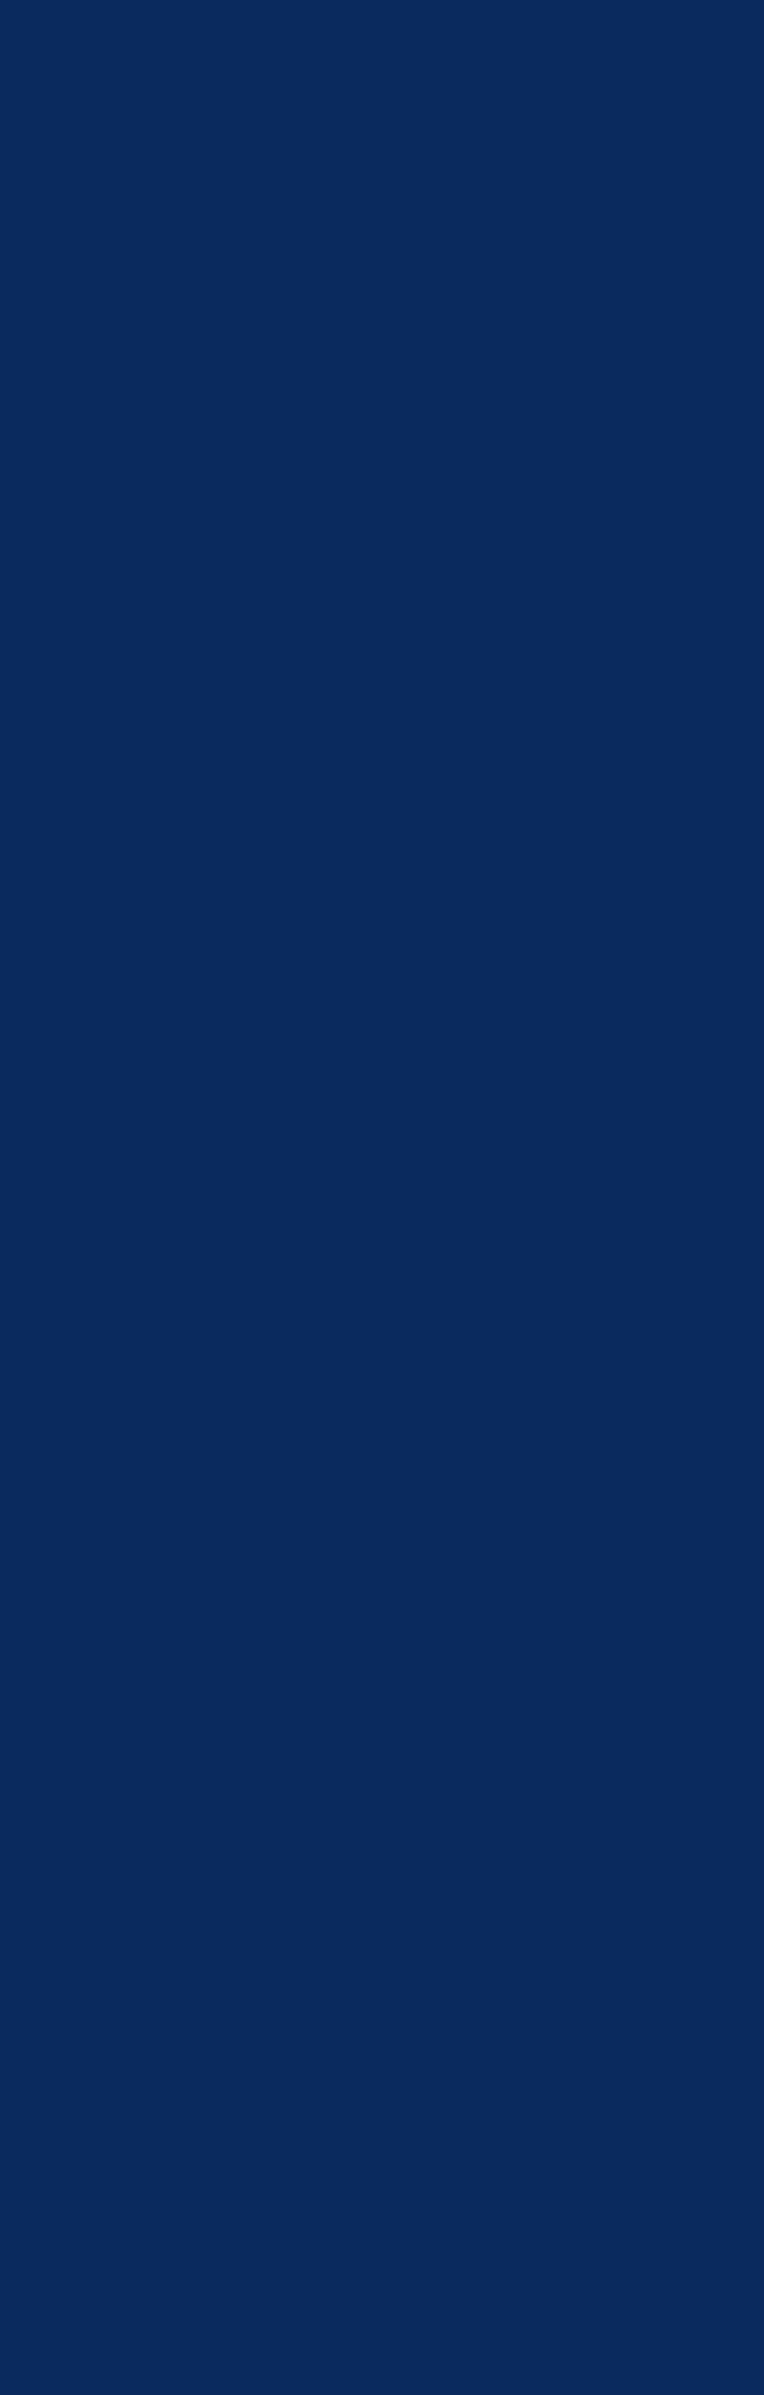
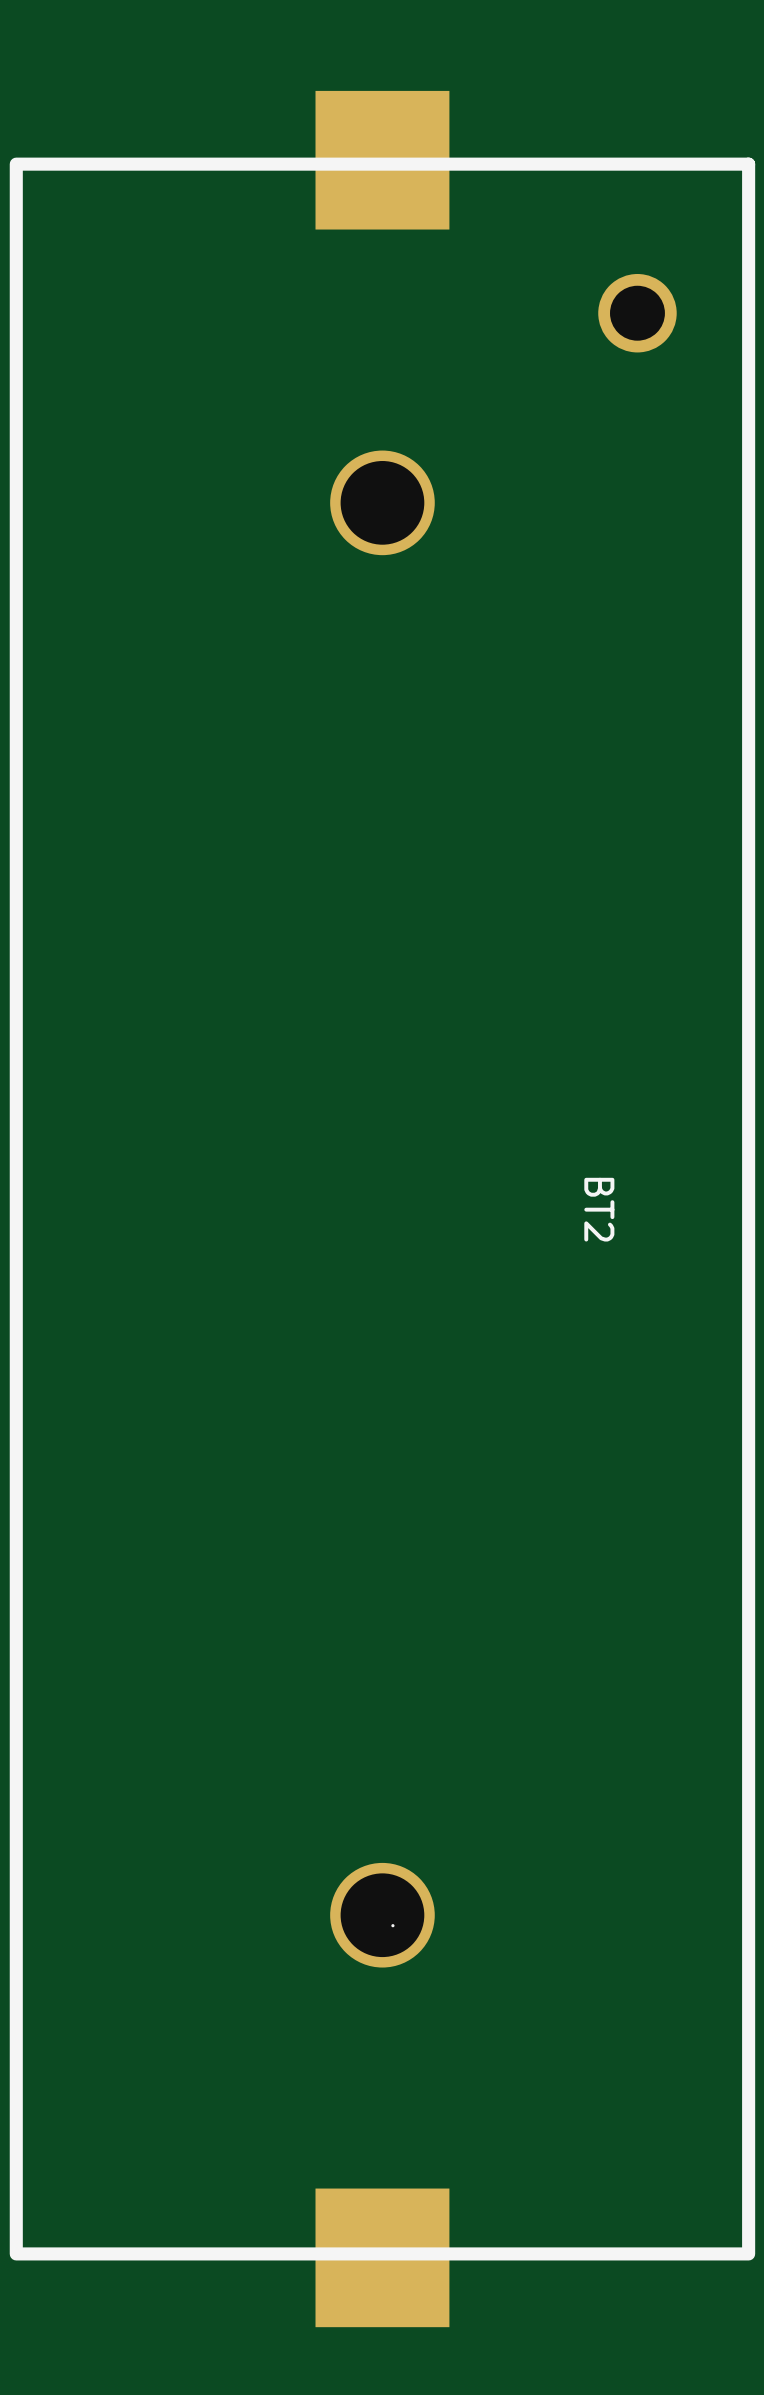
BT2: none -> (382, 1209)

